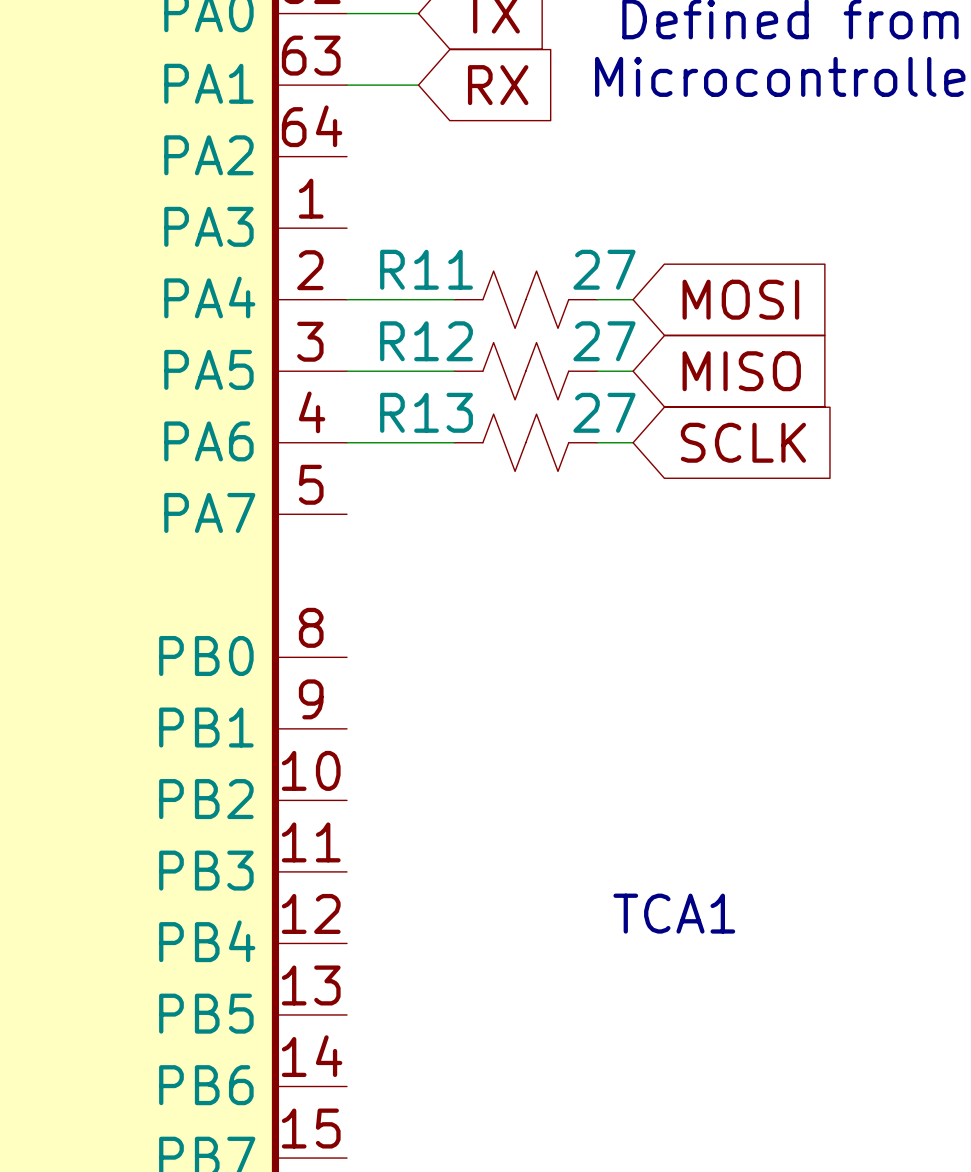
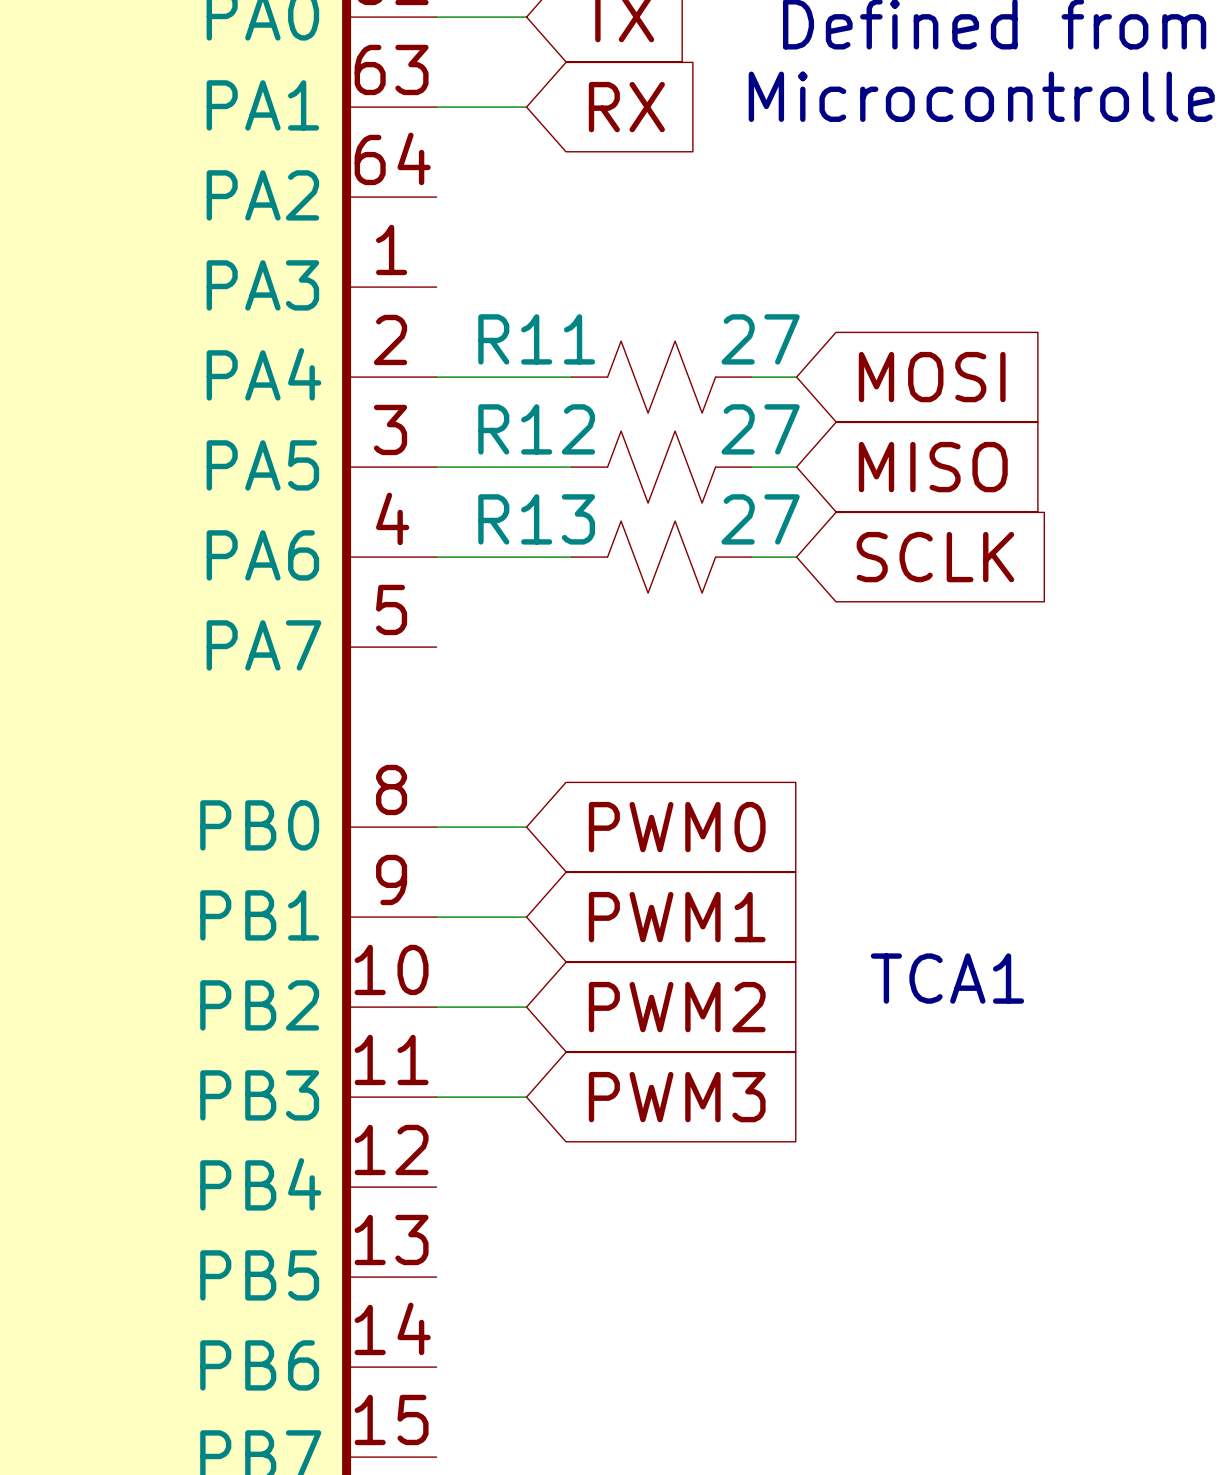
wire: none -> (436, 827) (526, 827)
global label: none -> PWM0 (677, 827)
wire: none -> (436, 917) (526, 917)
global label: none -> PWM1 (677, 917)
wire: none -> (436, 1007) (526, 1007)
global label: none -> PWM2 (677, 1007)
wire: none -> (436, 1097) (526, 1097)
global label: none -> PWM3 (677, 1097)
text position: TCA1 (674, 913) -> TCA1 (947, 978)

